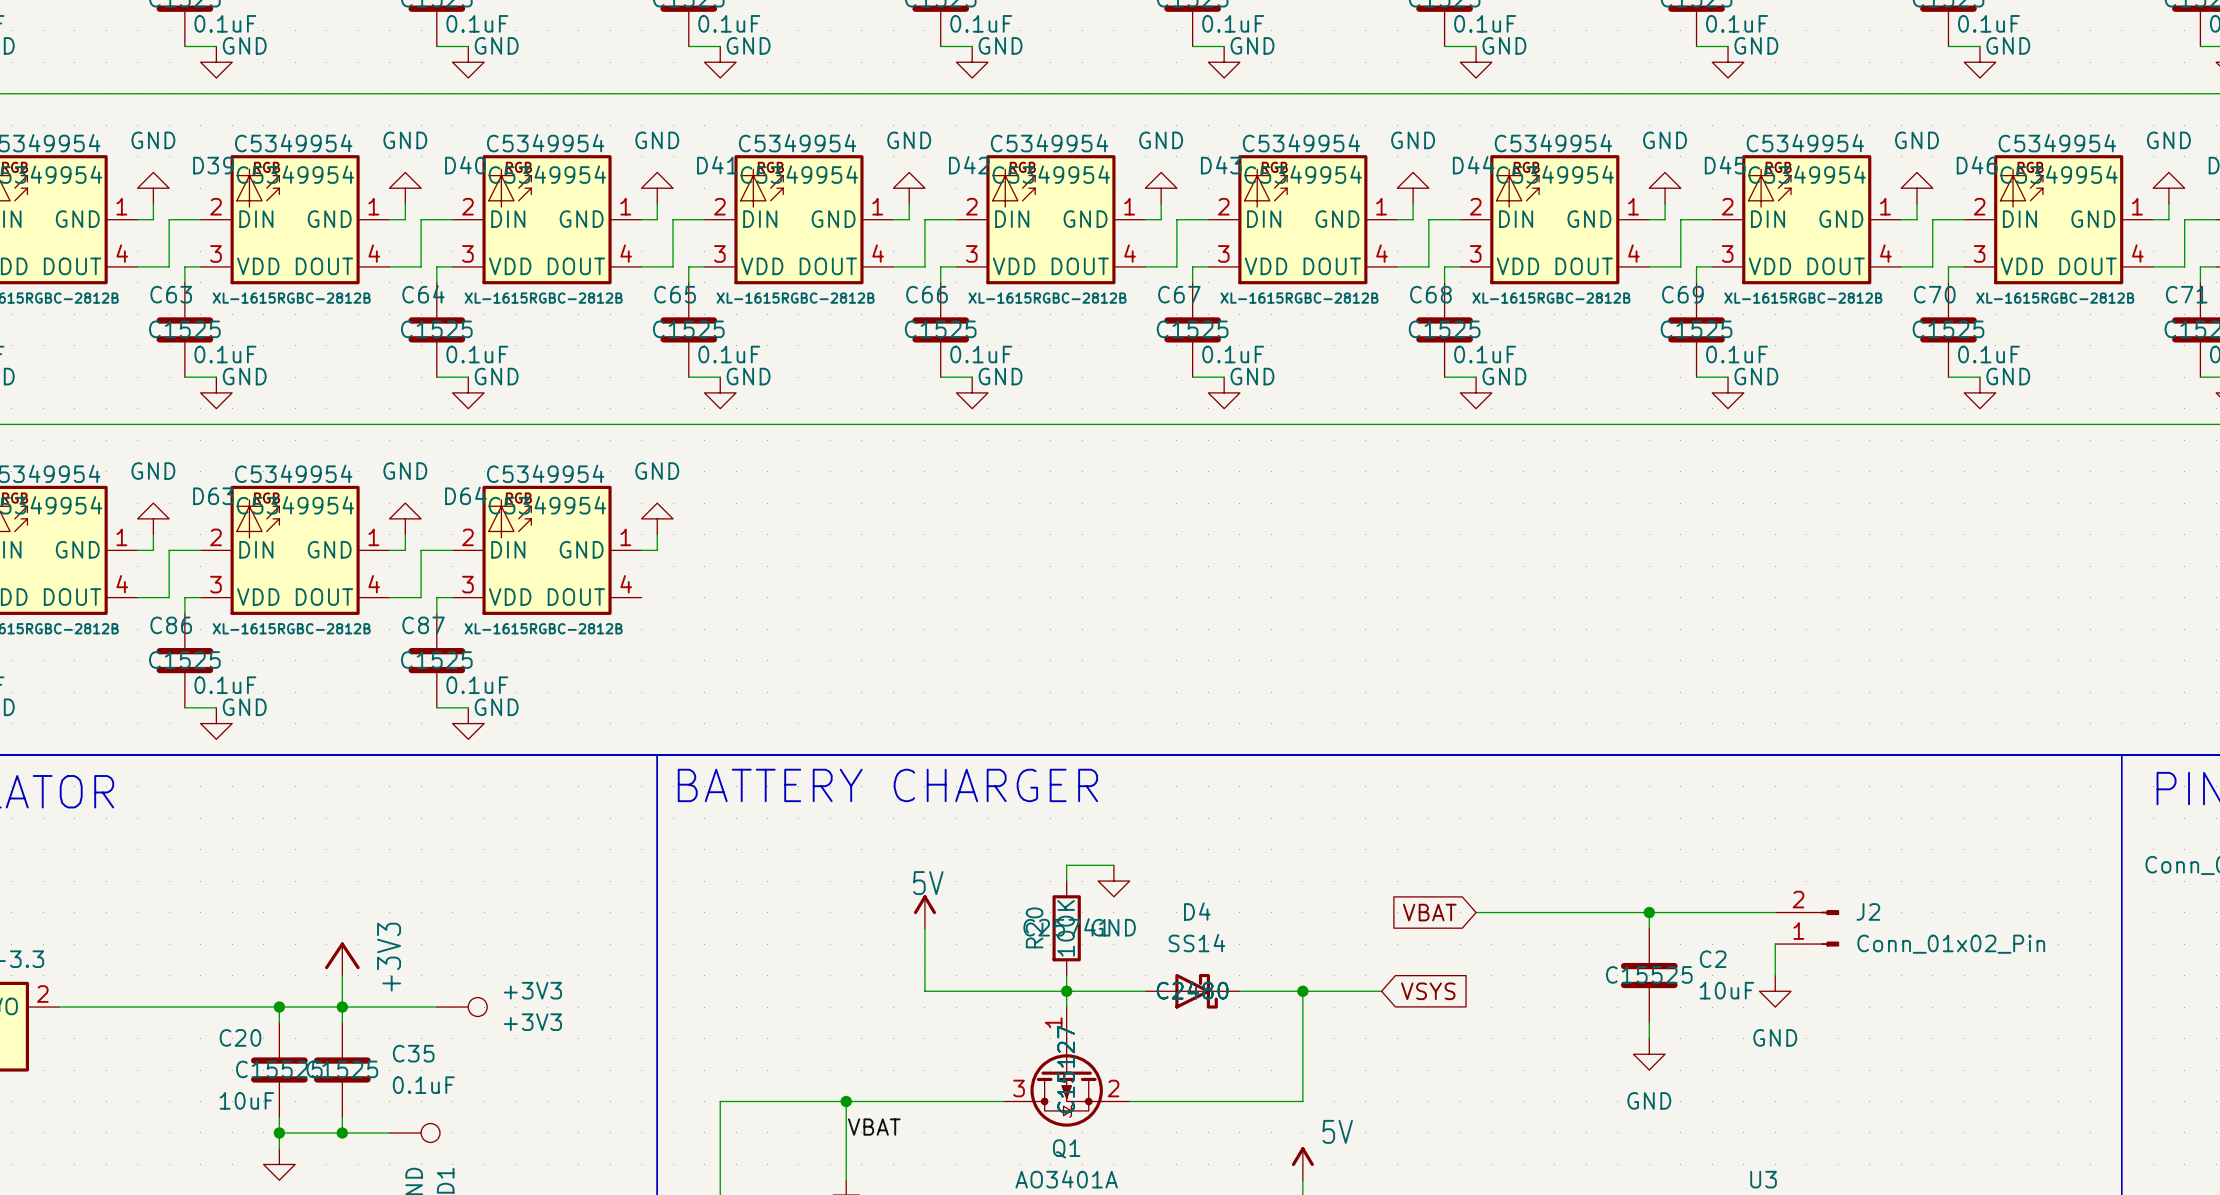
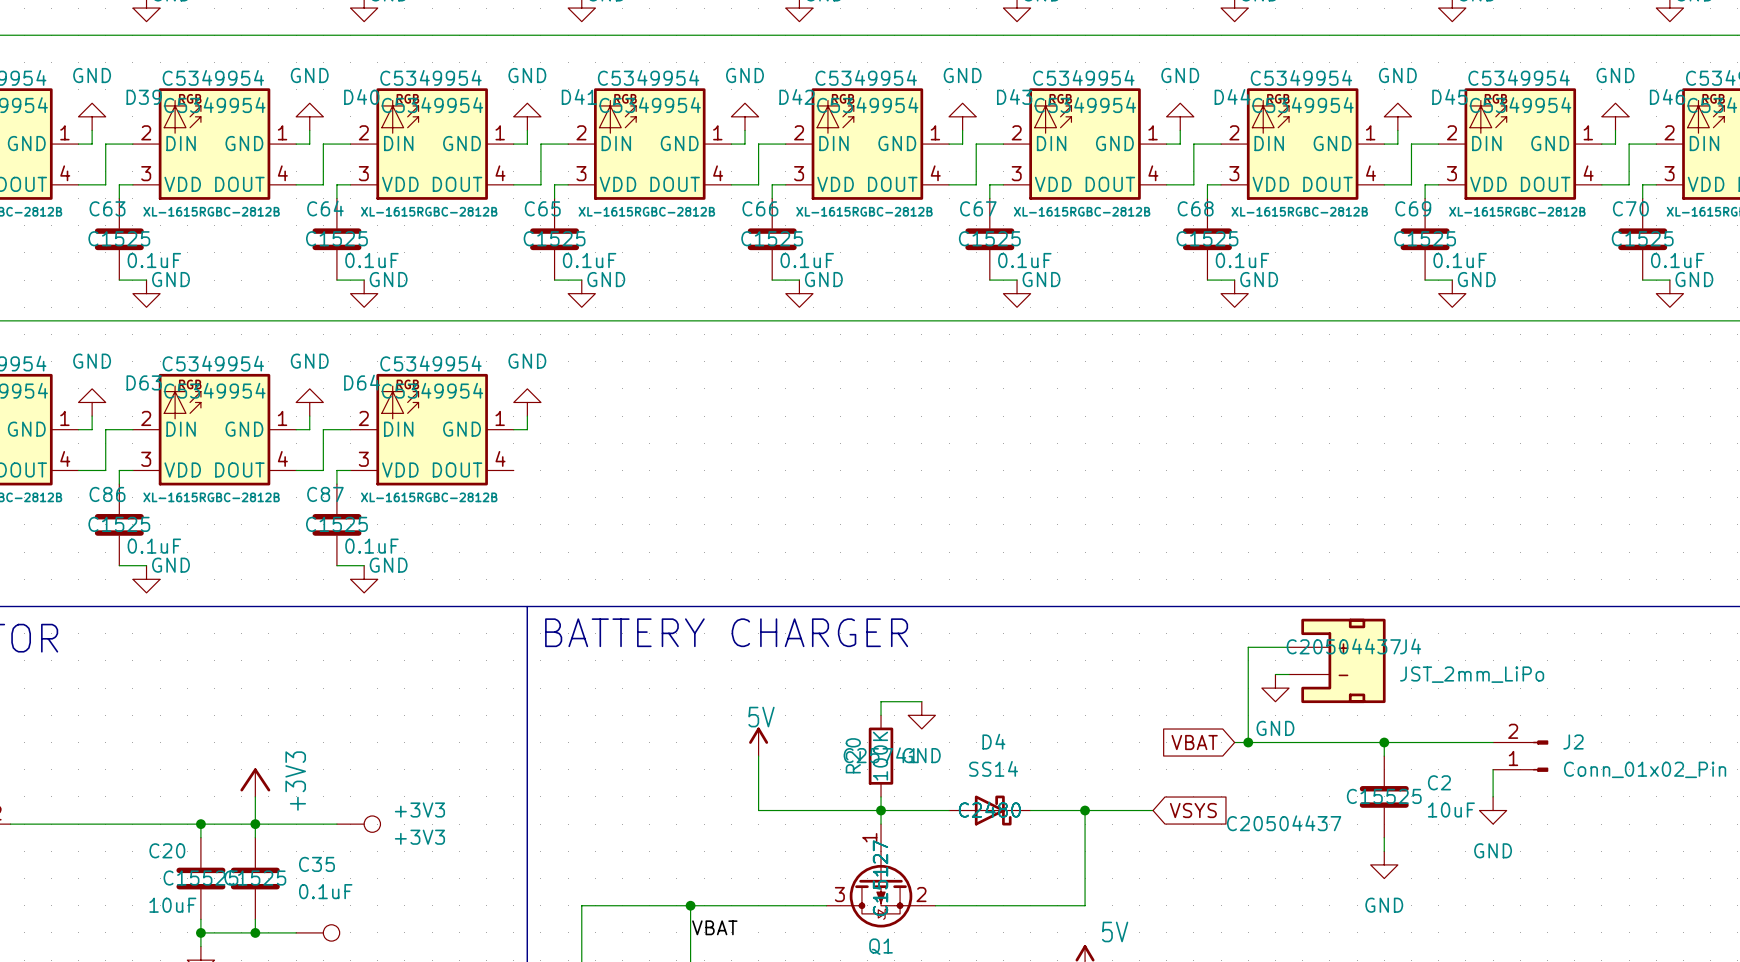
wire: none -> (1289, 647) (1248, 647) (1248, 742)
J4: none -> JST_2mm_LiPo (1337, 660)
wire: none -> (1275, 674) (1289, 674)
power symbol: none -> GND (1275, 688)
junction: none -> (1248, 742)

